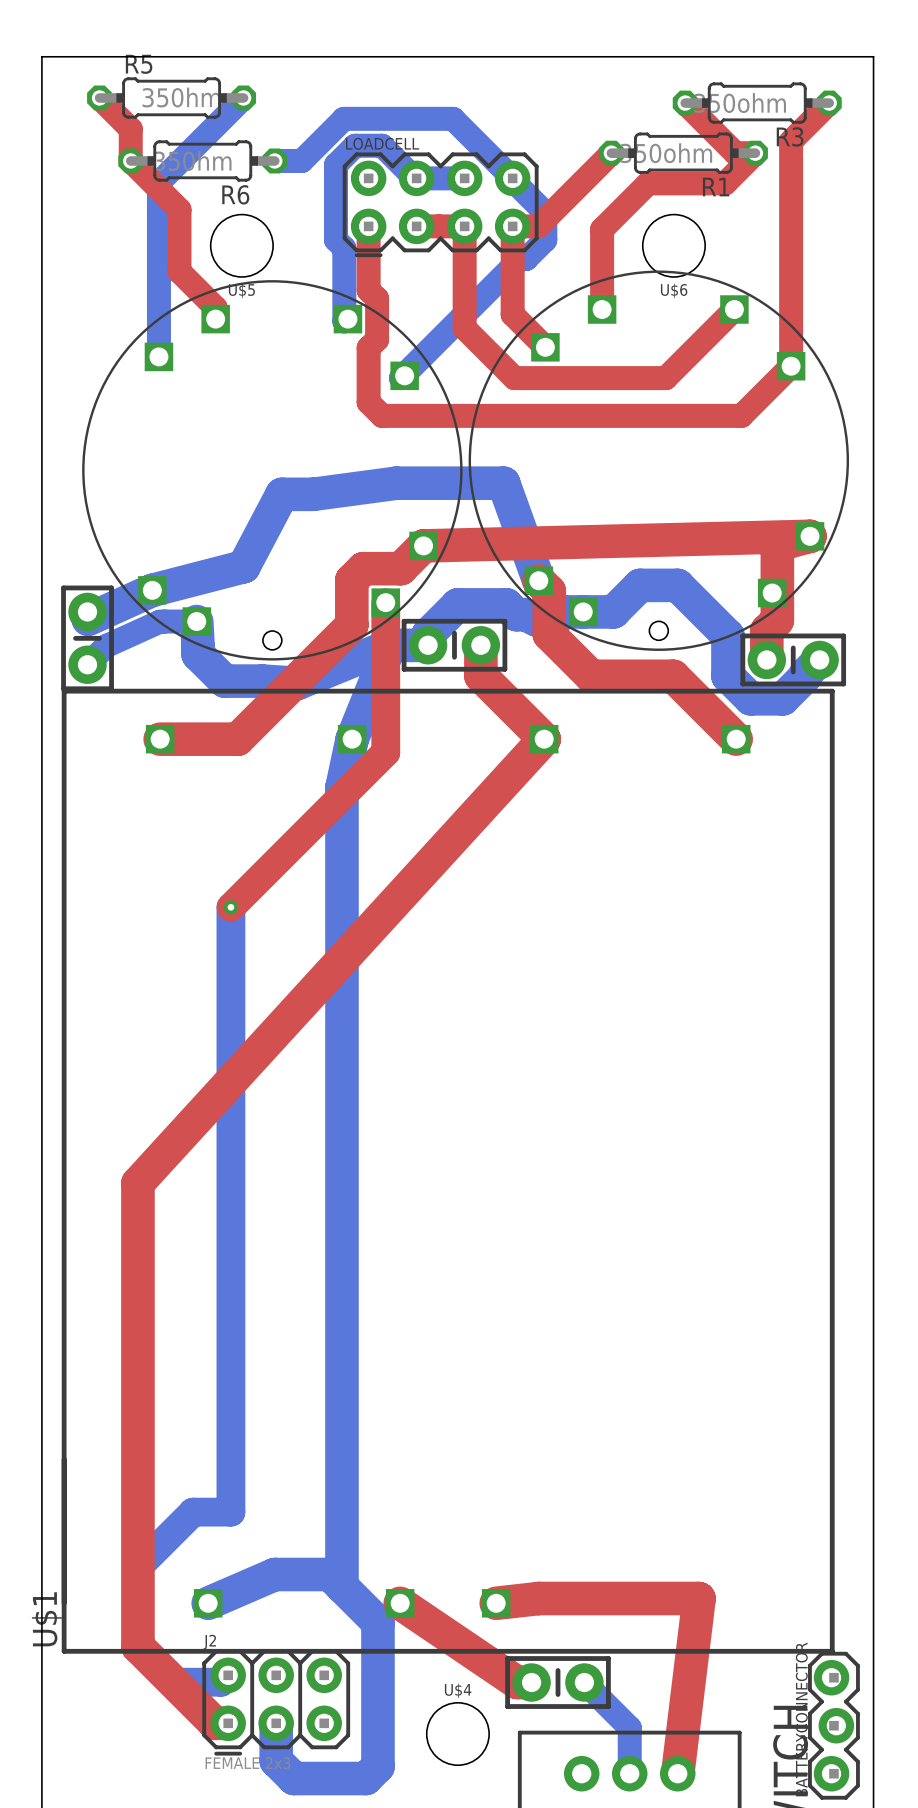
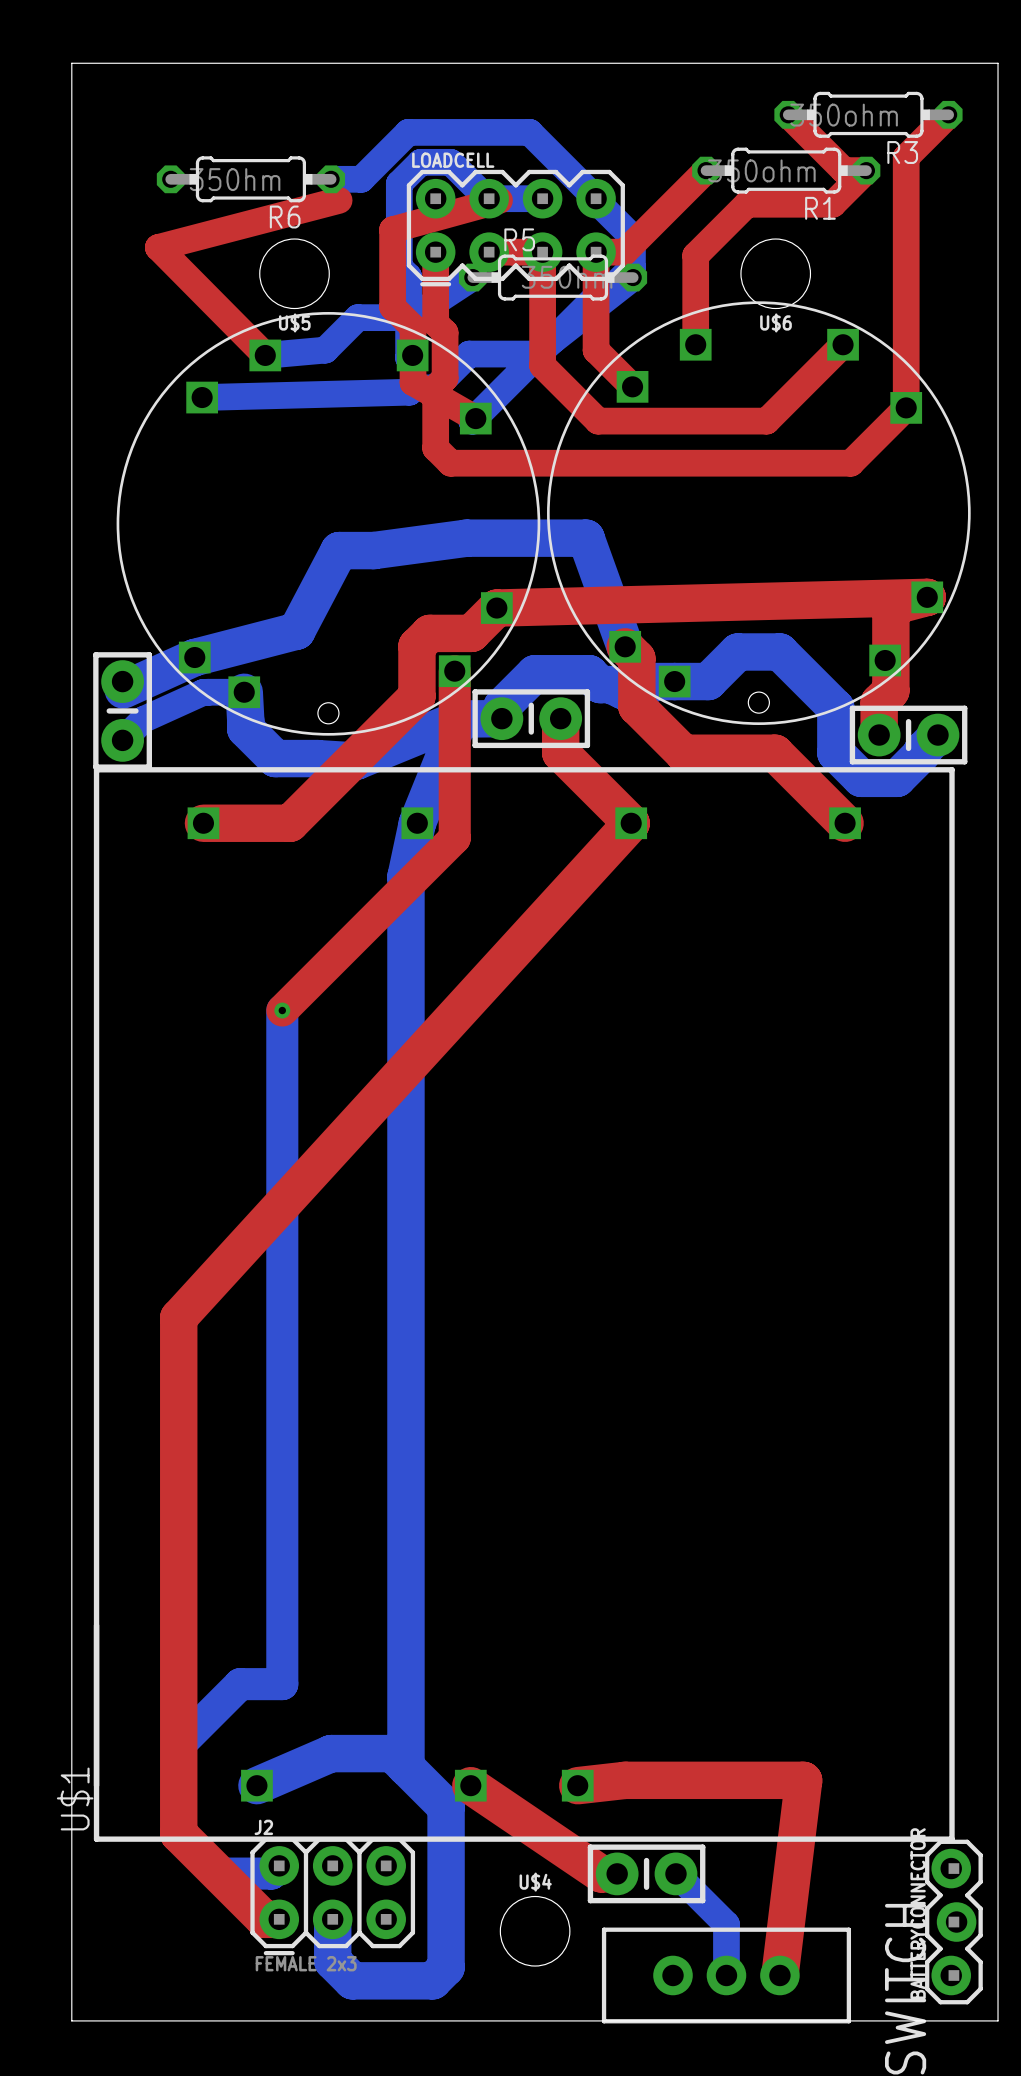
top track: (99, 97) (130, 129) (130, 160) (179, 209) (179, 271) (215, 307) (215, 319) -> (339, 200) (158, 247) (265, 355)
R5 position: (171, 97) -> (553, 277)
bottom track: (243, 97) (158, 182) (158, 356) -> (633, 277) (535, 354) (469, 354) (435, 387) (413, 387) (409, 392) (202, 397)
top track: none -> (499, 200) (392, 229) (392, 306) (413, 327) (413, 382) (475, 418)
bottom track: none -> (472, 277) (411, 317) (357, 317) (325, 350) (265, 355)

